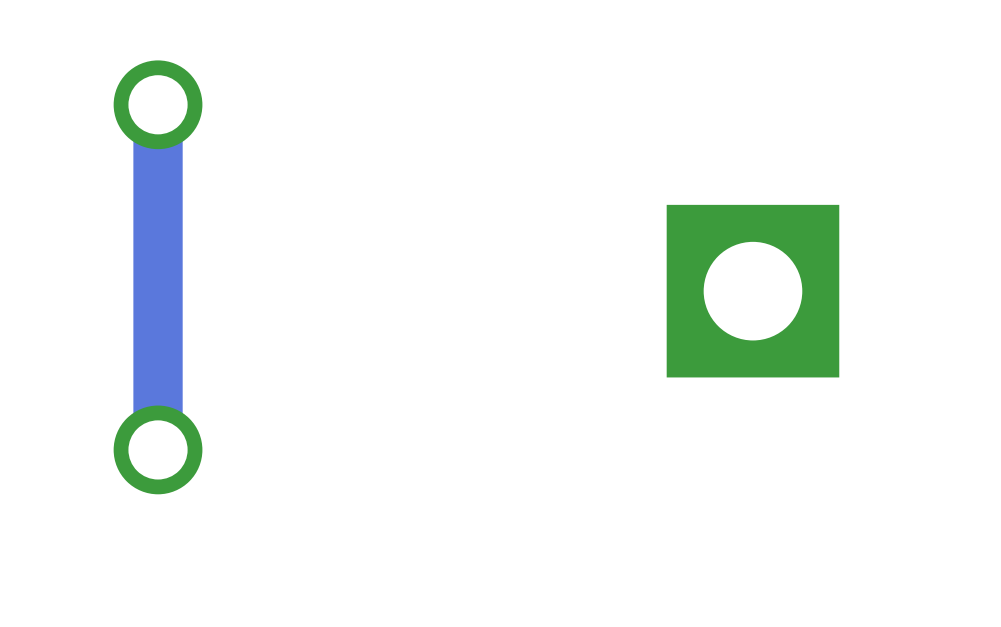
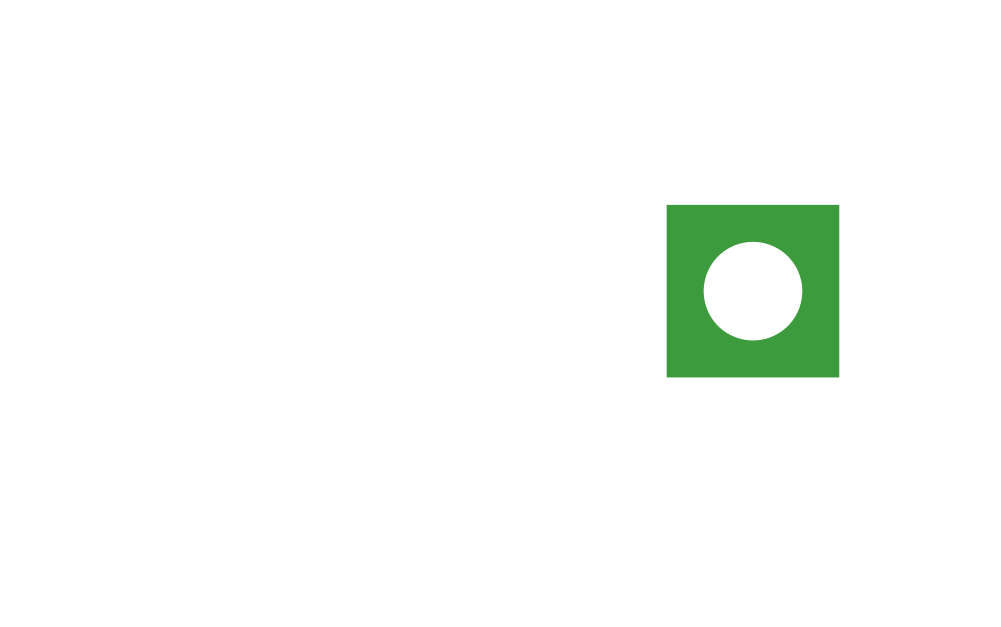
track: (158, 104) (158, 449) -> none
via: (158, 104) -> none
via: (158, 449) -> none

